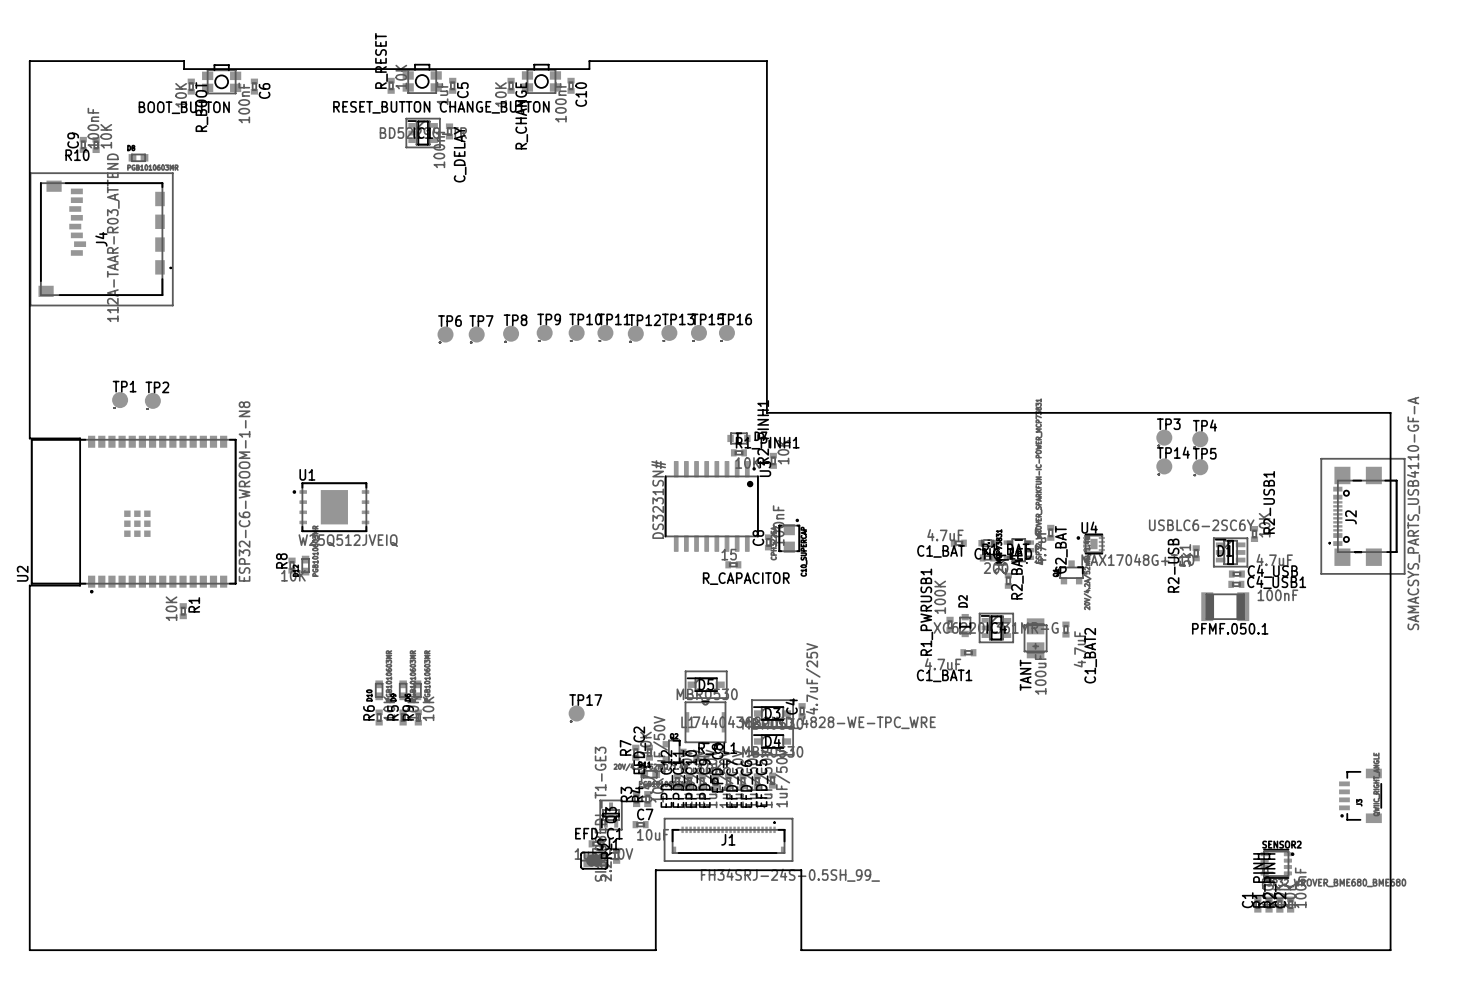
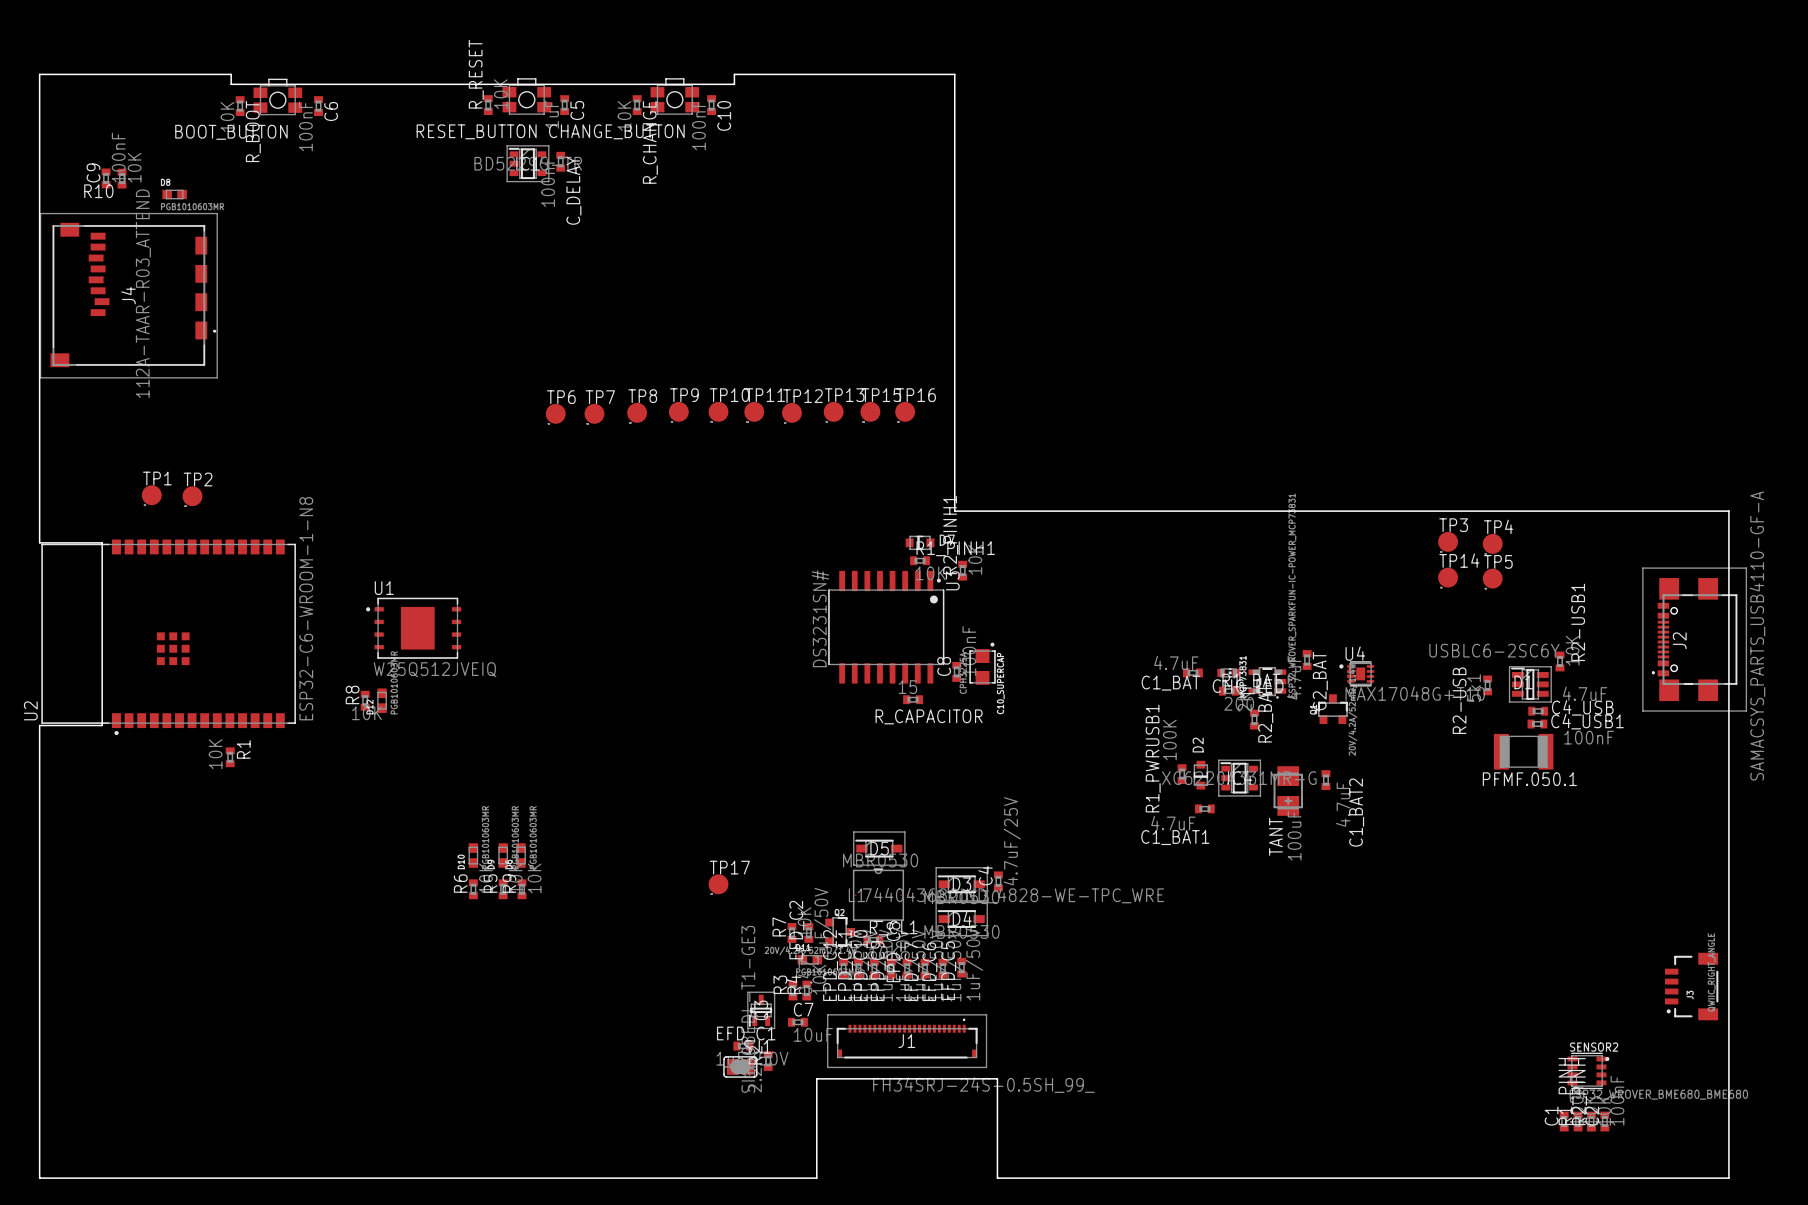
L1 footprint: [684, 700, 727, 744] -> [852, 868, 905, 923]

